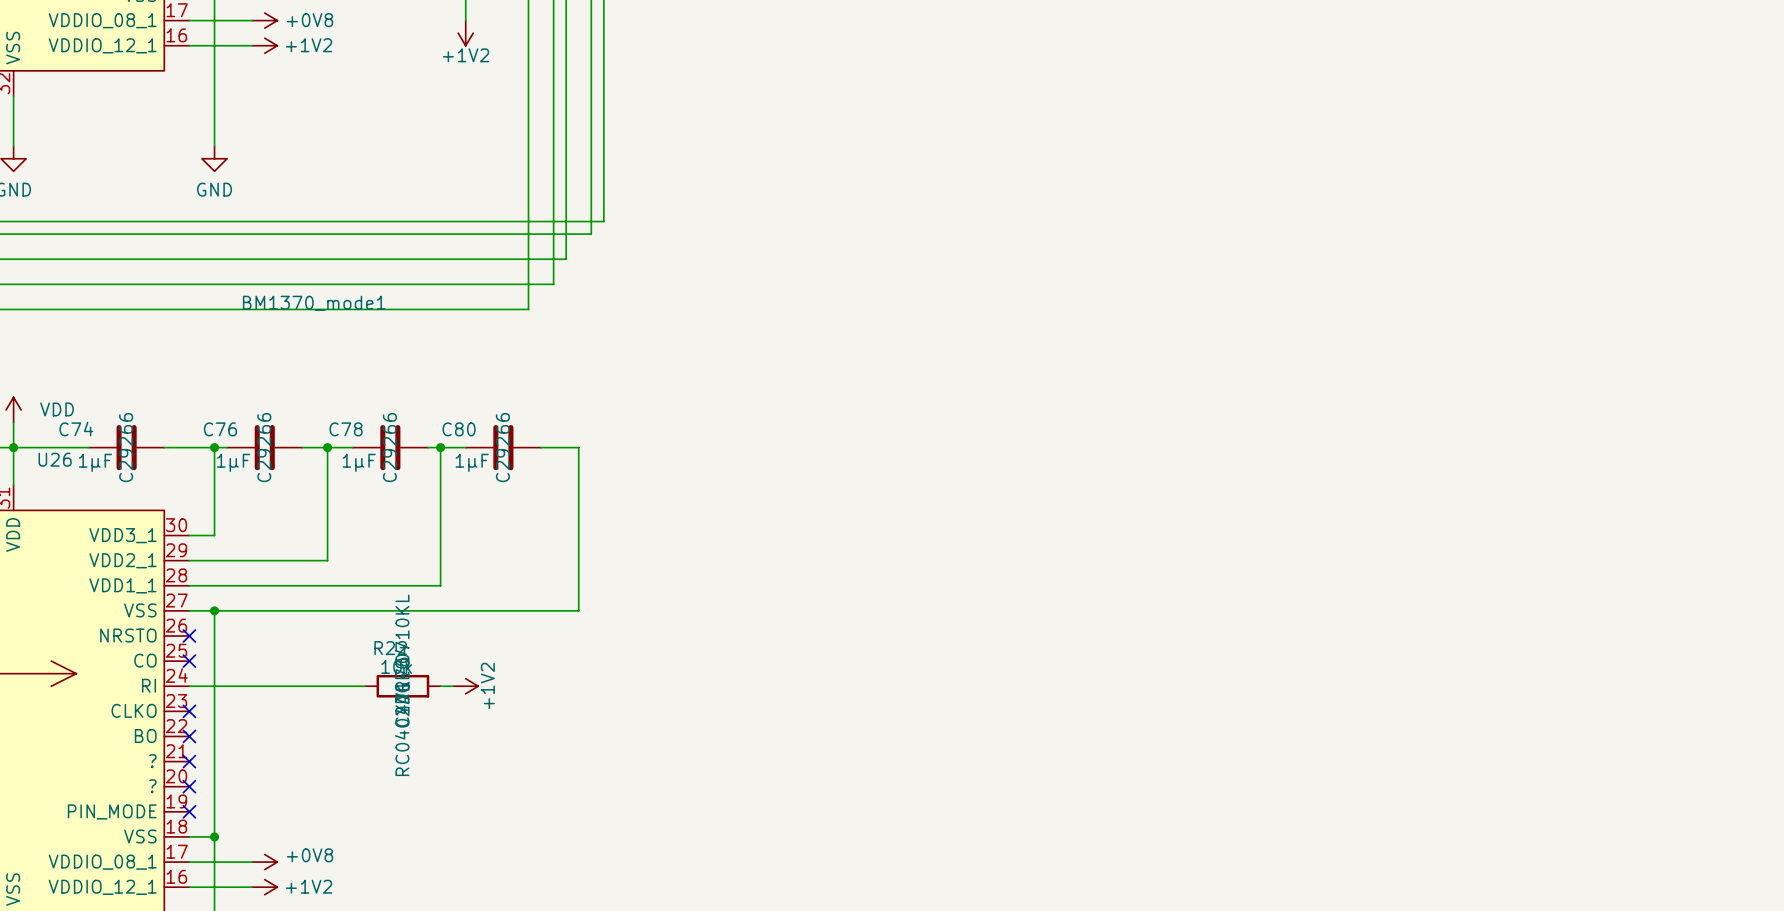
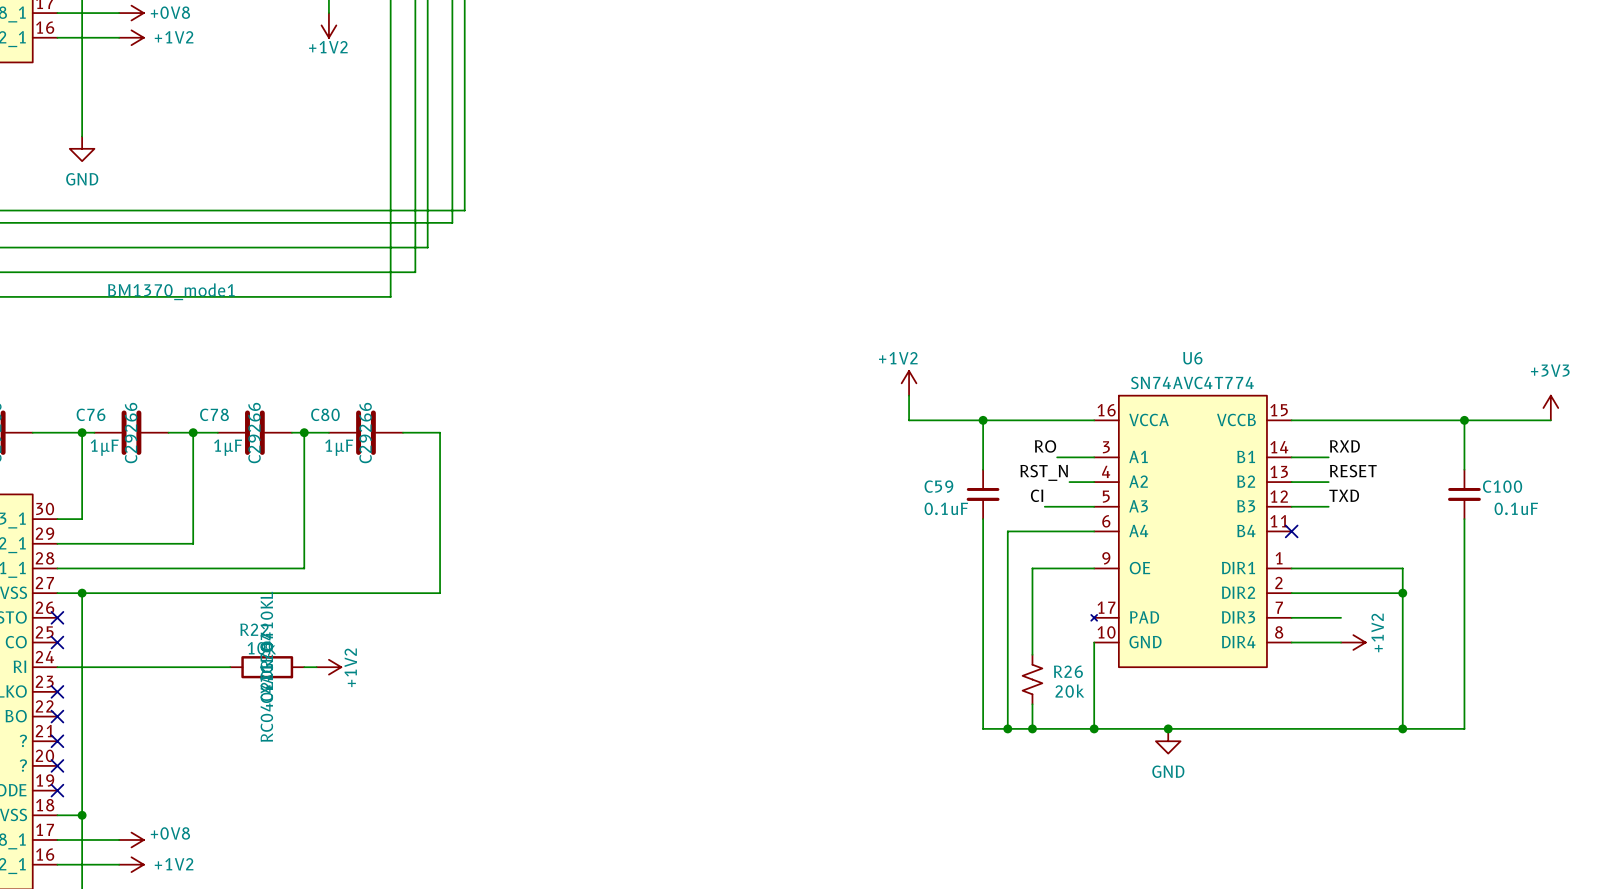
power symbol: none -> +1V2 (909, 383)
wire: none -> (909, 395) (909, 420) (1094, 420)
power symbol: none -> +3V3 (1550, 408)
wire: none -> (983, 420) (983, 469)
junction: none -> (983, 420)
wire: none -> (1291, 420) (1550, 420)
wire: none -> (1464, 420) (1464, 469)
junction: none -> (1464, 420)
label: none -> RO (1045, 446)
label: none -> RXD (1344, 446)
wire: none -> (1057, 457) (1094, 457)
wire: none -> (1291, 457) (1328, 457)
label: none -> RESET (1353, 471)
label: none -> RST_N (1044, 472)
wire: none -> (1069, 482) (1094, 482)
wire: none -> (1291, 482) (1328, 482)
C59: none -> 0.1uF (983, 494)
C100: none -> 0.1uF (1464, 494)
label: none -> CI (1037, 495)
label: none -> TXD (1344, 495)
wire: none -> (1044, 506) (1094, 506)
wire: none -> (1291, 506) (1328, 506)
wire: none -> (983, 519) (983, 728) (1464, 728) (1464, 519)
wire: none -> (1094, 531) (1007, 531) (1007, 728)
U6: none -> SN74AVC4T774 (1191, 531)
no-connect mark: none -> (1291, 531)
wire: none -> (1094, 568) (1032, 568) (1032, 654)
wire: none -> (1291, 568) (1402, 568) (1402, 728)
wire: none -> (1291, 593) (1402, 593)
junction: none -> (1402, 593)
wire: none -> (1291, 617) (1341, 617)
wire: none -> (1094, 642) (1094, 728)
wire: none -> (1291, 642) (1341, 642)
power symbol: none -> +1V2 (1353, 642)
R26: none -> 20k (1032, 679)
wire: none -> (1032, 704) (1032, 728)
junction: none -> (1007, 728)
junction: none -> (1032, 728)
junction: none -> (1094, 728)
junction: none -> (1168, 728)
junction: none -> (1402, 728)
power symbol: none -> GND (1168, 741)

